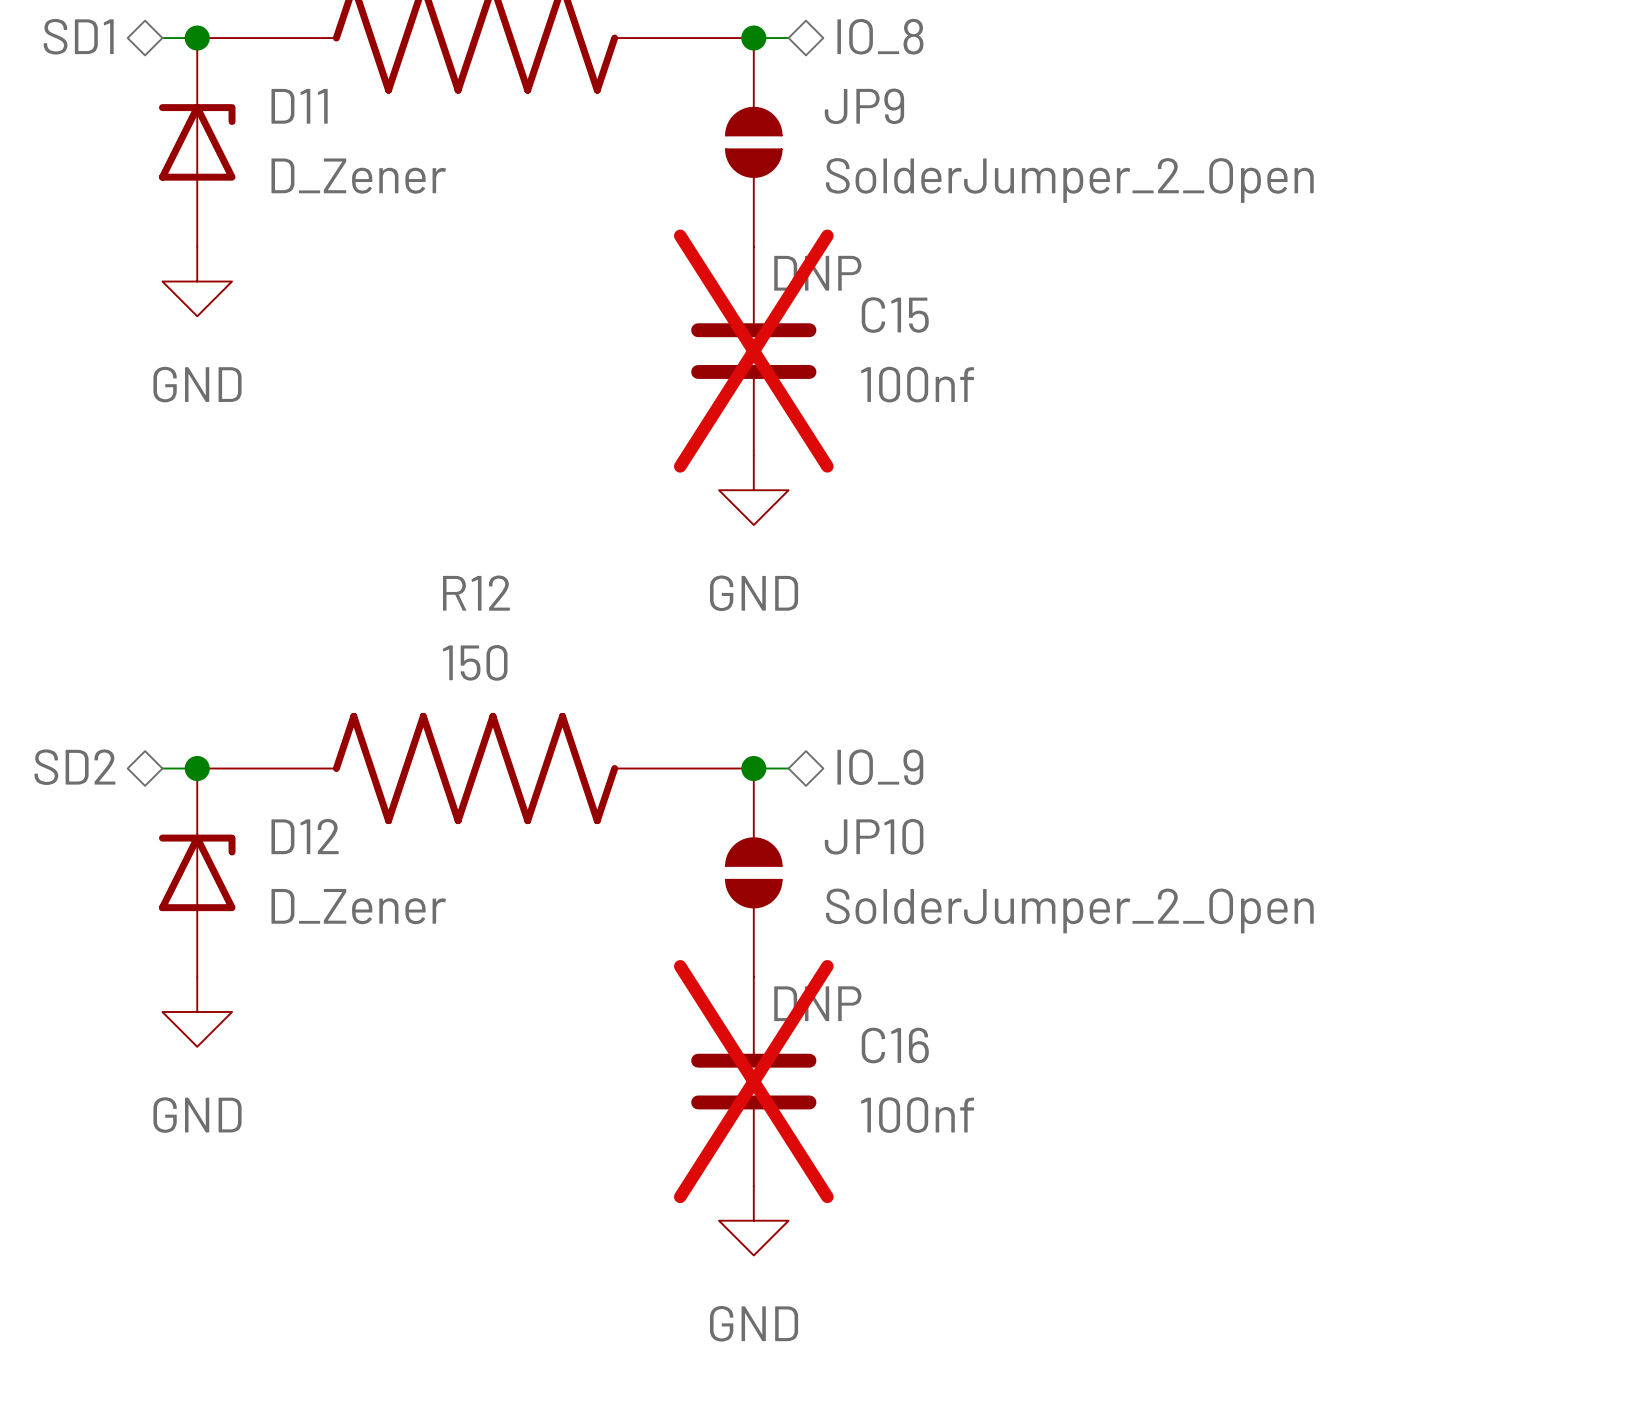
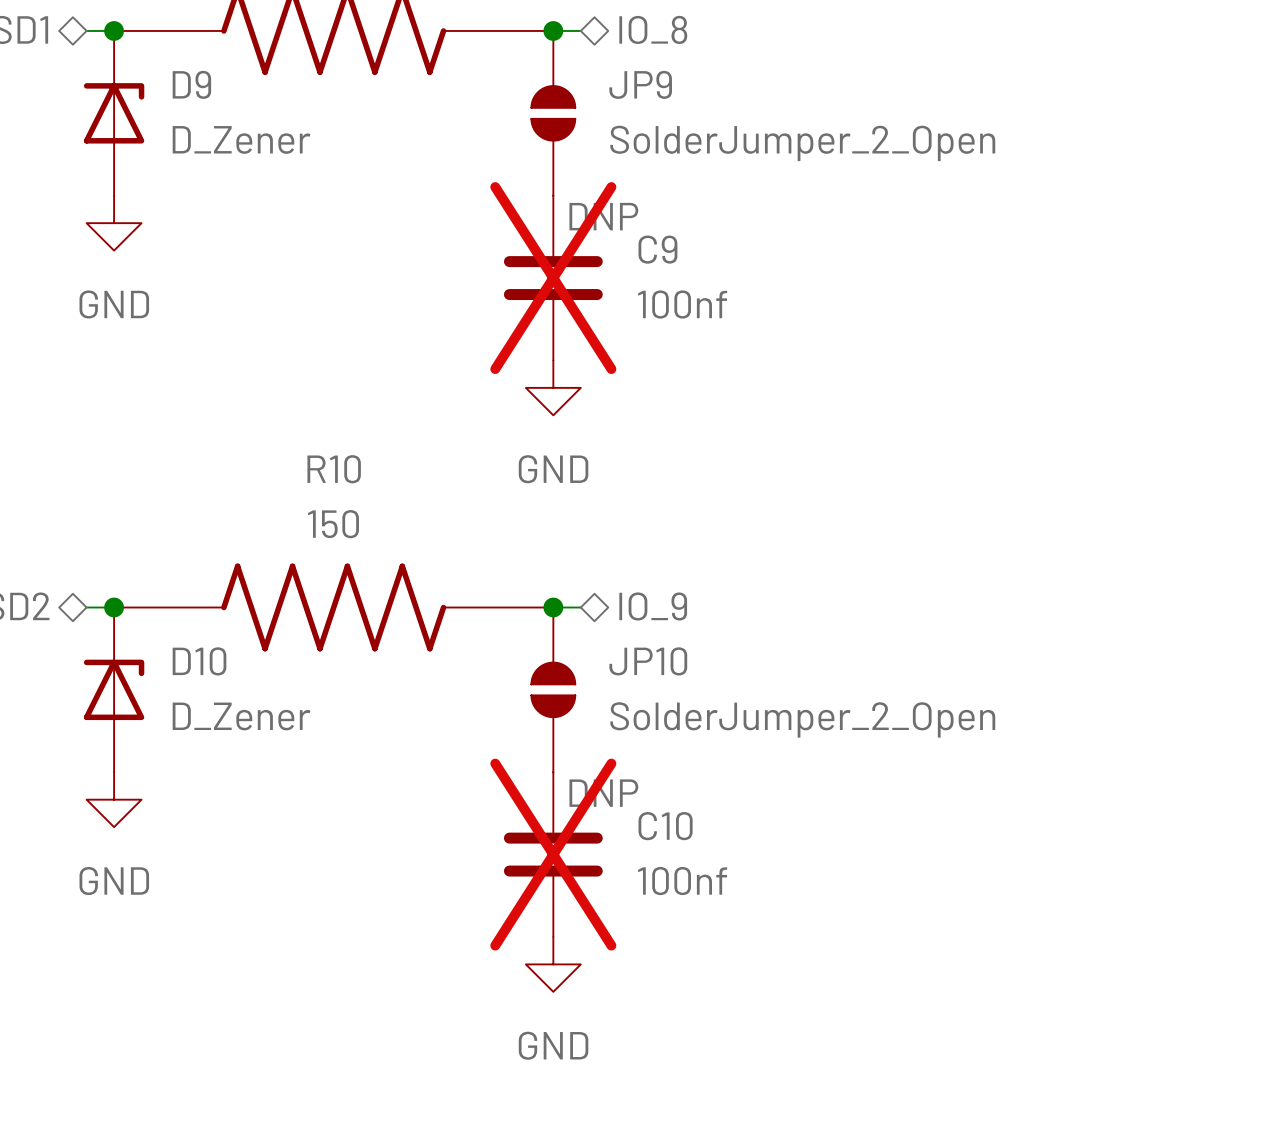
D11 name: D11 (299, 106) -> D9 (191, 84)
C15 name: C15 (895, 315) -> C9 (657, 249)
R12 name: R12 (476, 593) -> R10 (334, 469)
D12 name: D12 (305, 836) -> D10 (199, 661)
C16 name: C16 (895, 1045) -> C10 (665, 826)

